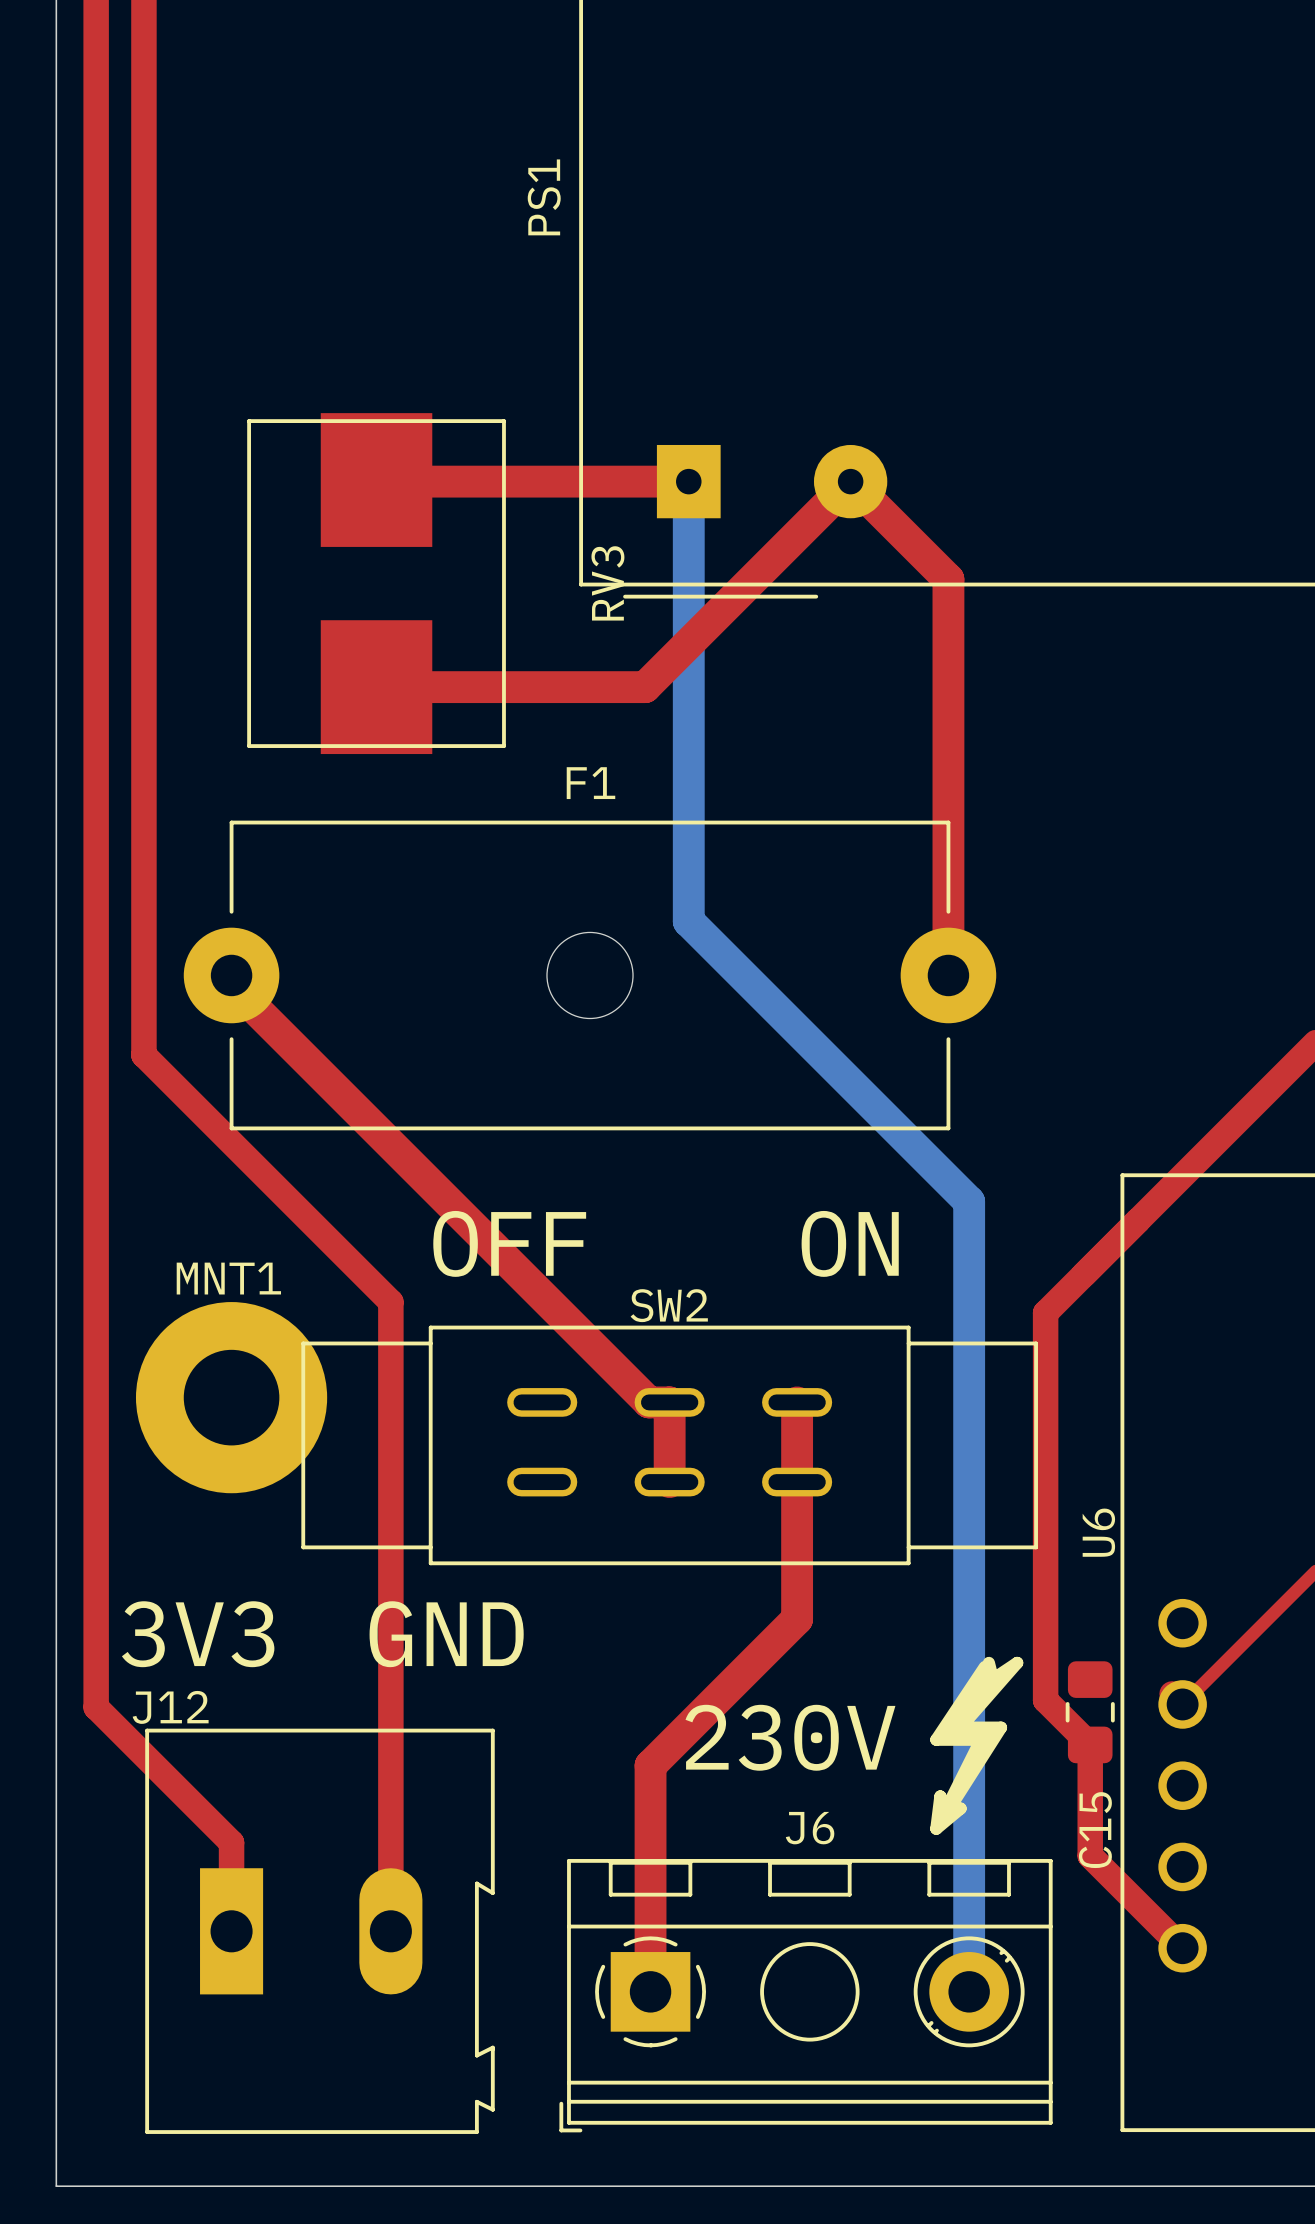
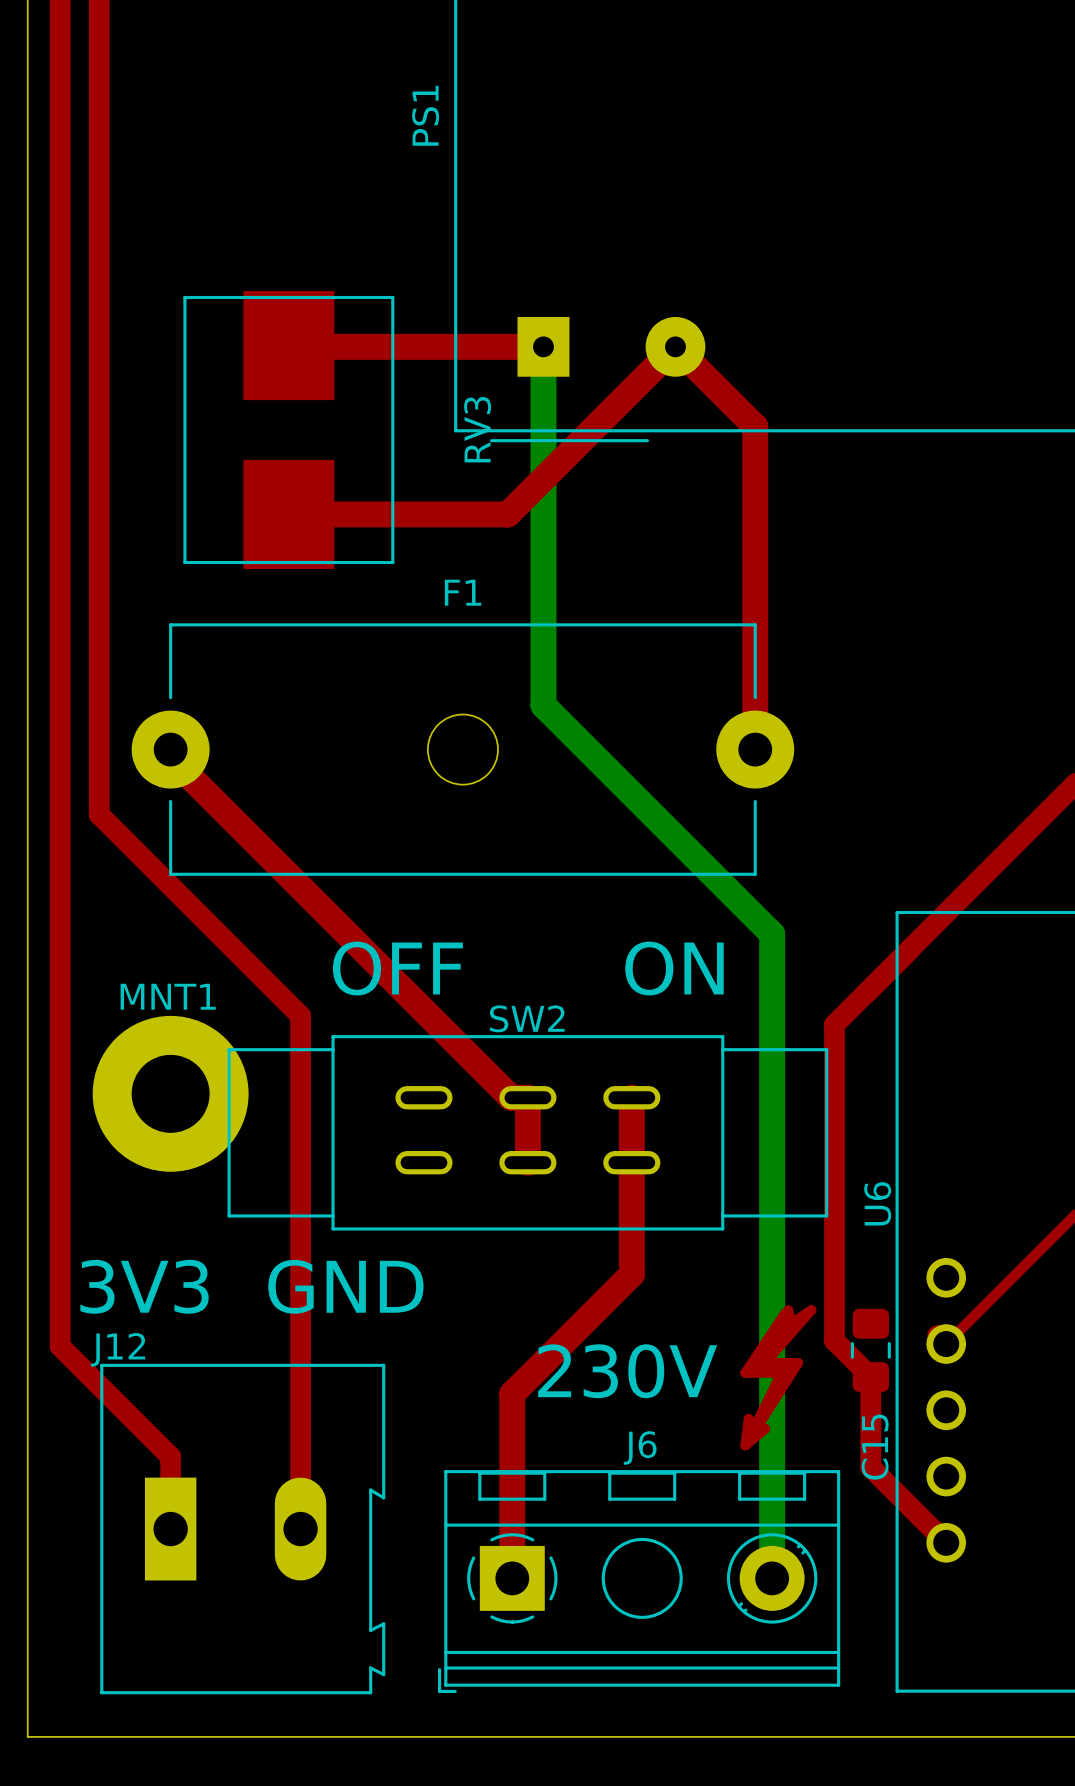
drawing shape: [930, 1656, 1024, 1835] -> [740, 1305, 817, 1451]

